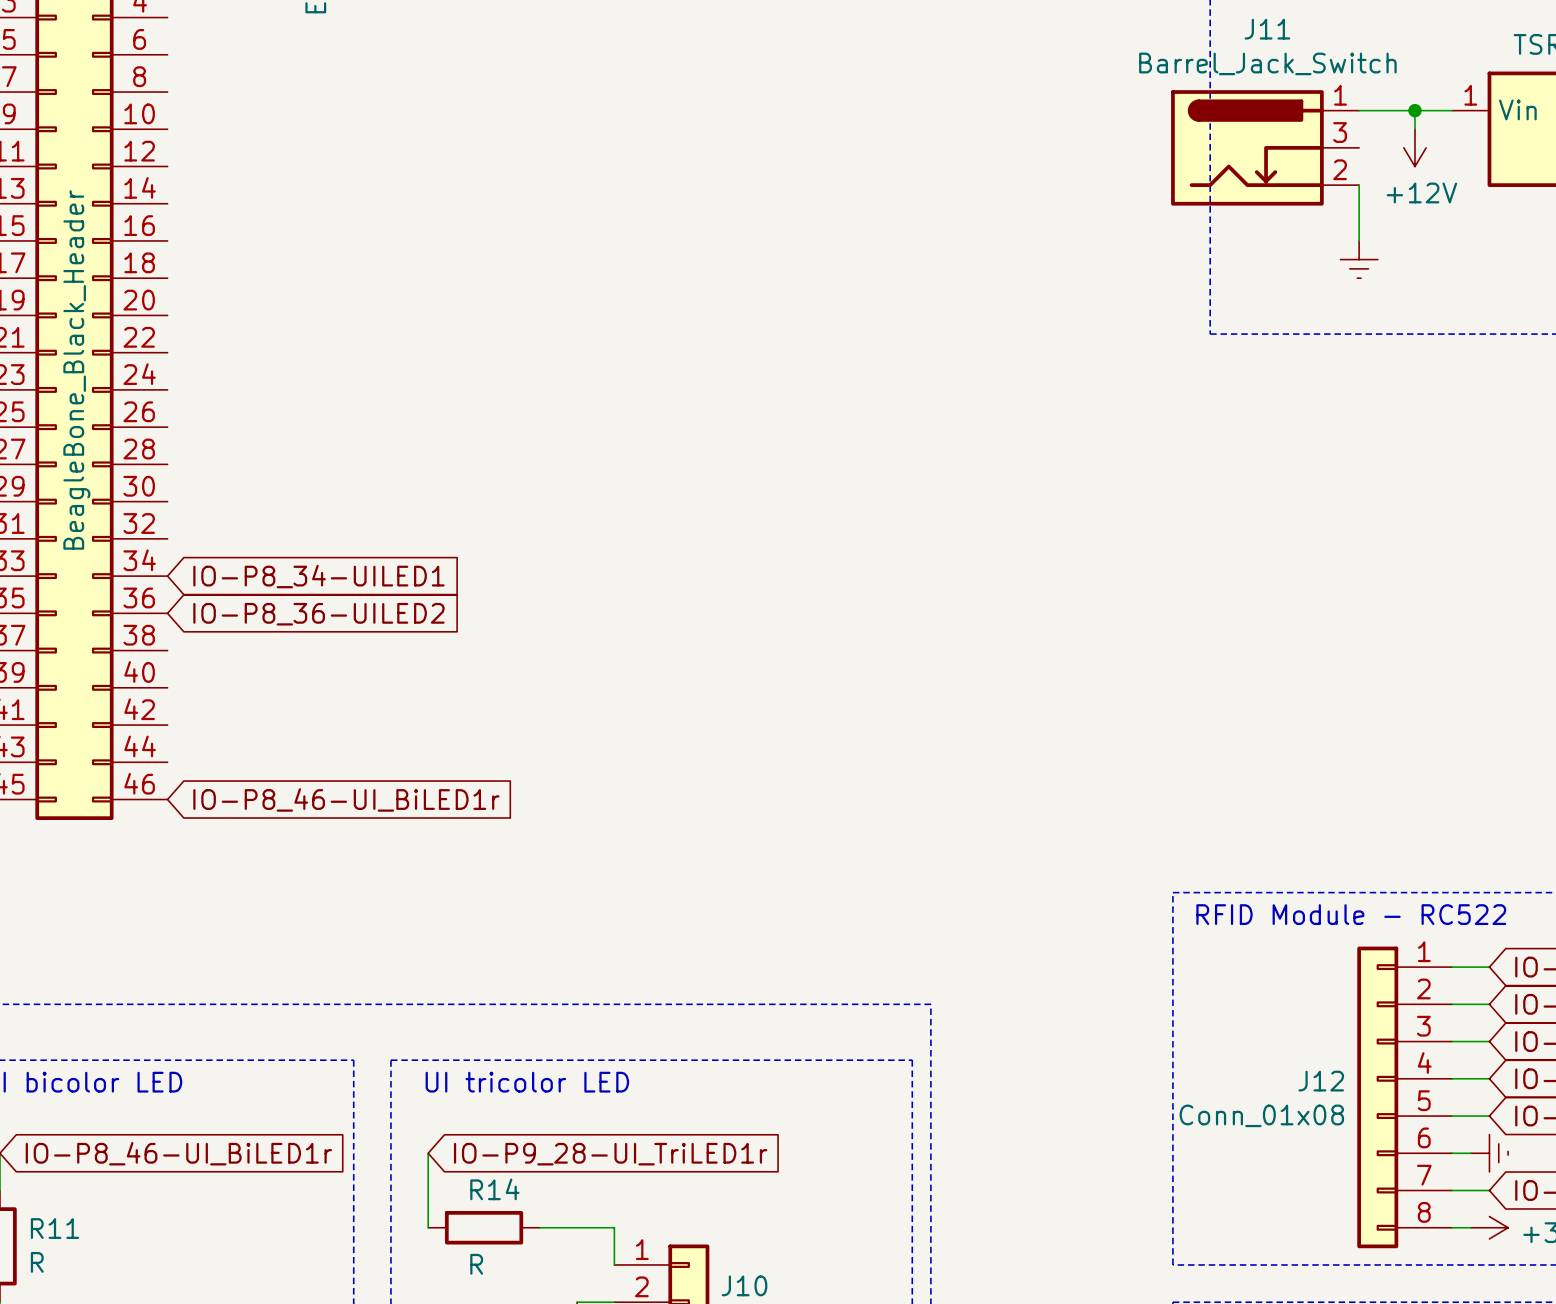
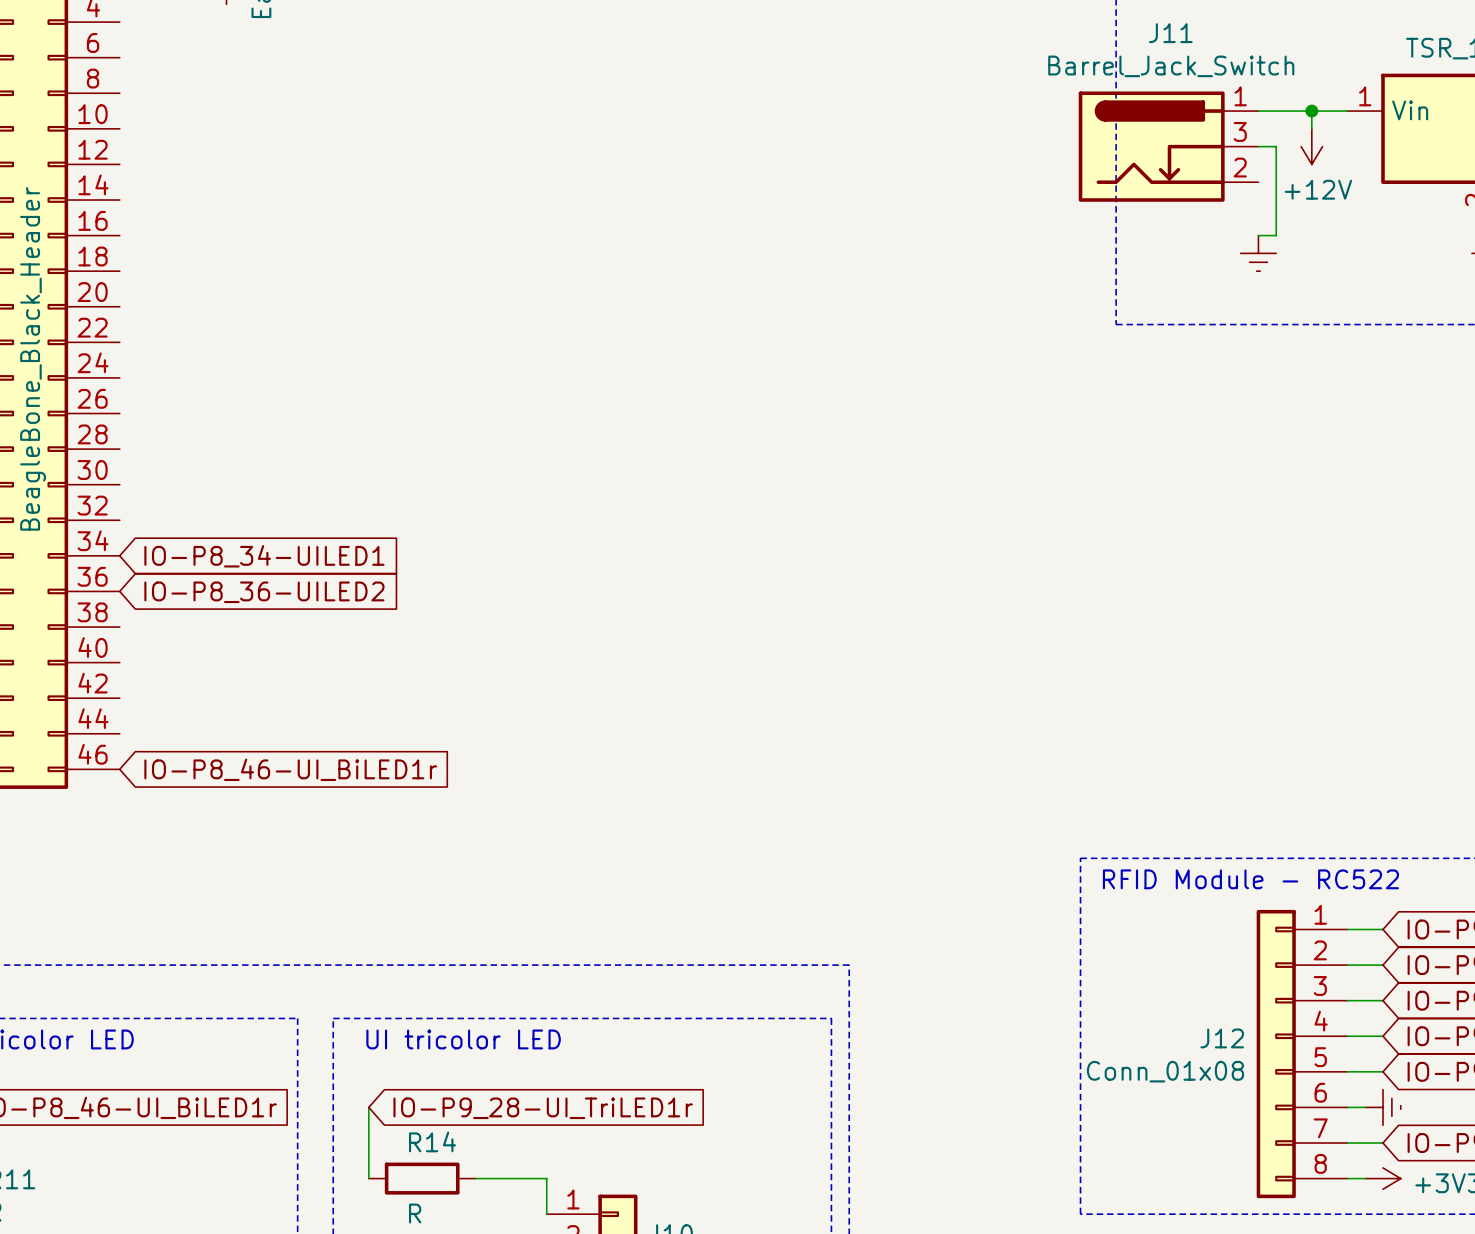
wire: (1359, 185) (1359, 240) -> (1258, 146) (1276, 146) (1276, 235) (1258, 235)

